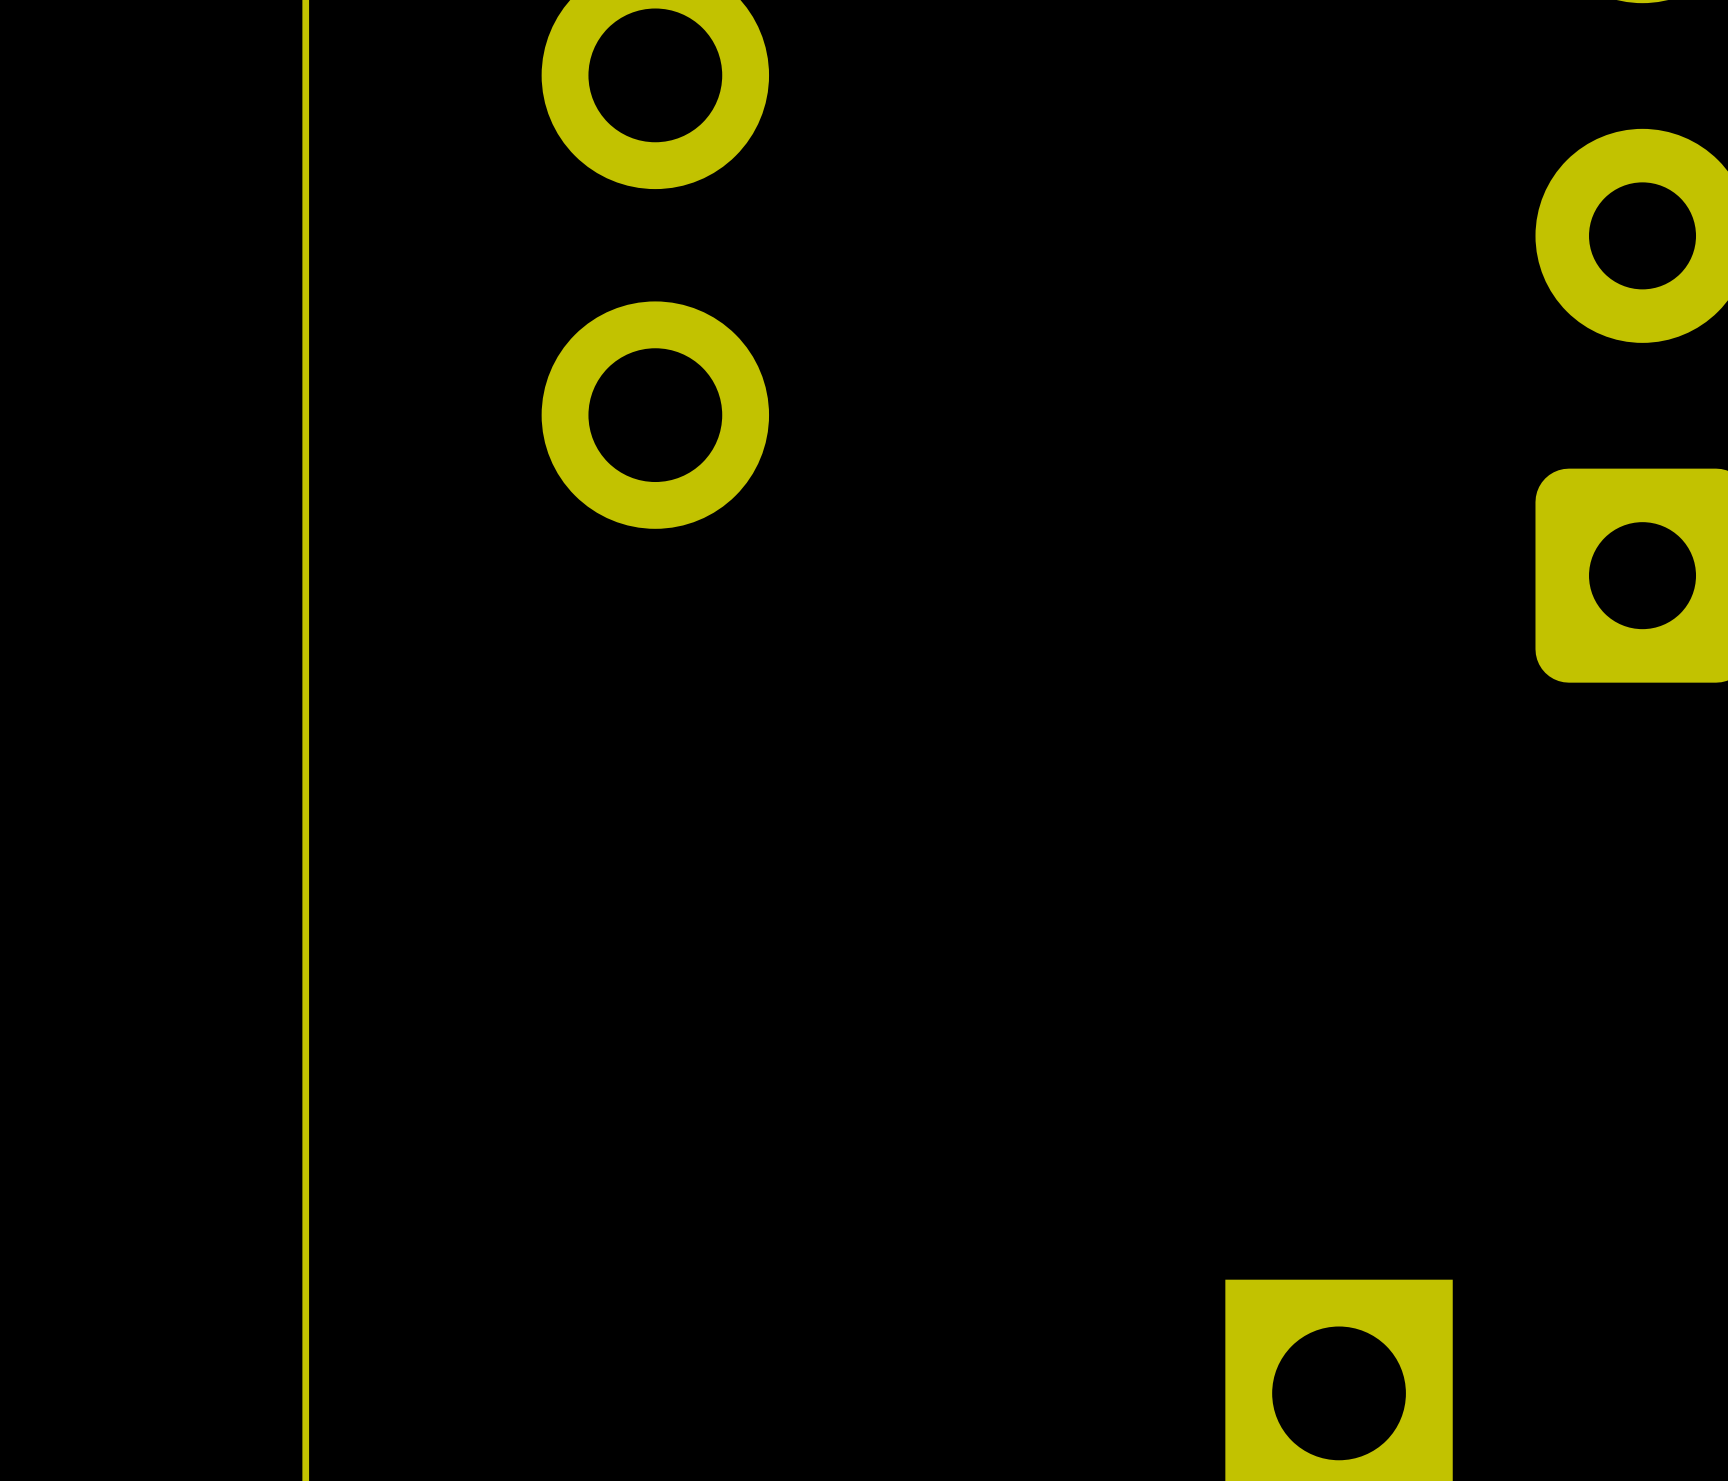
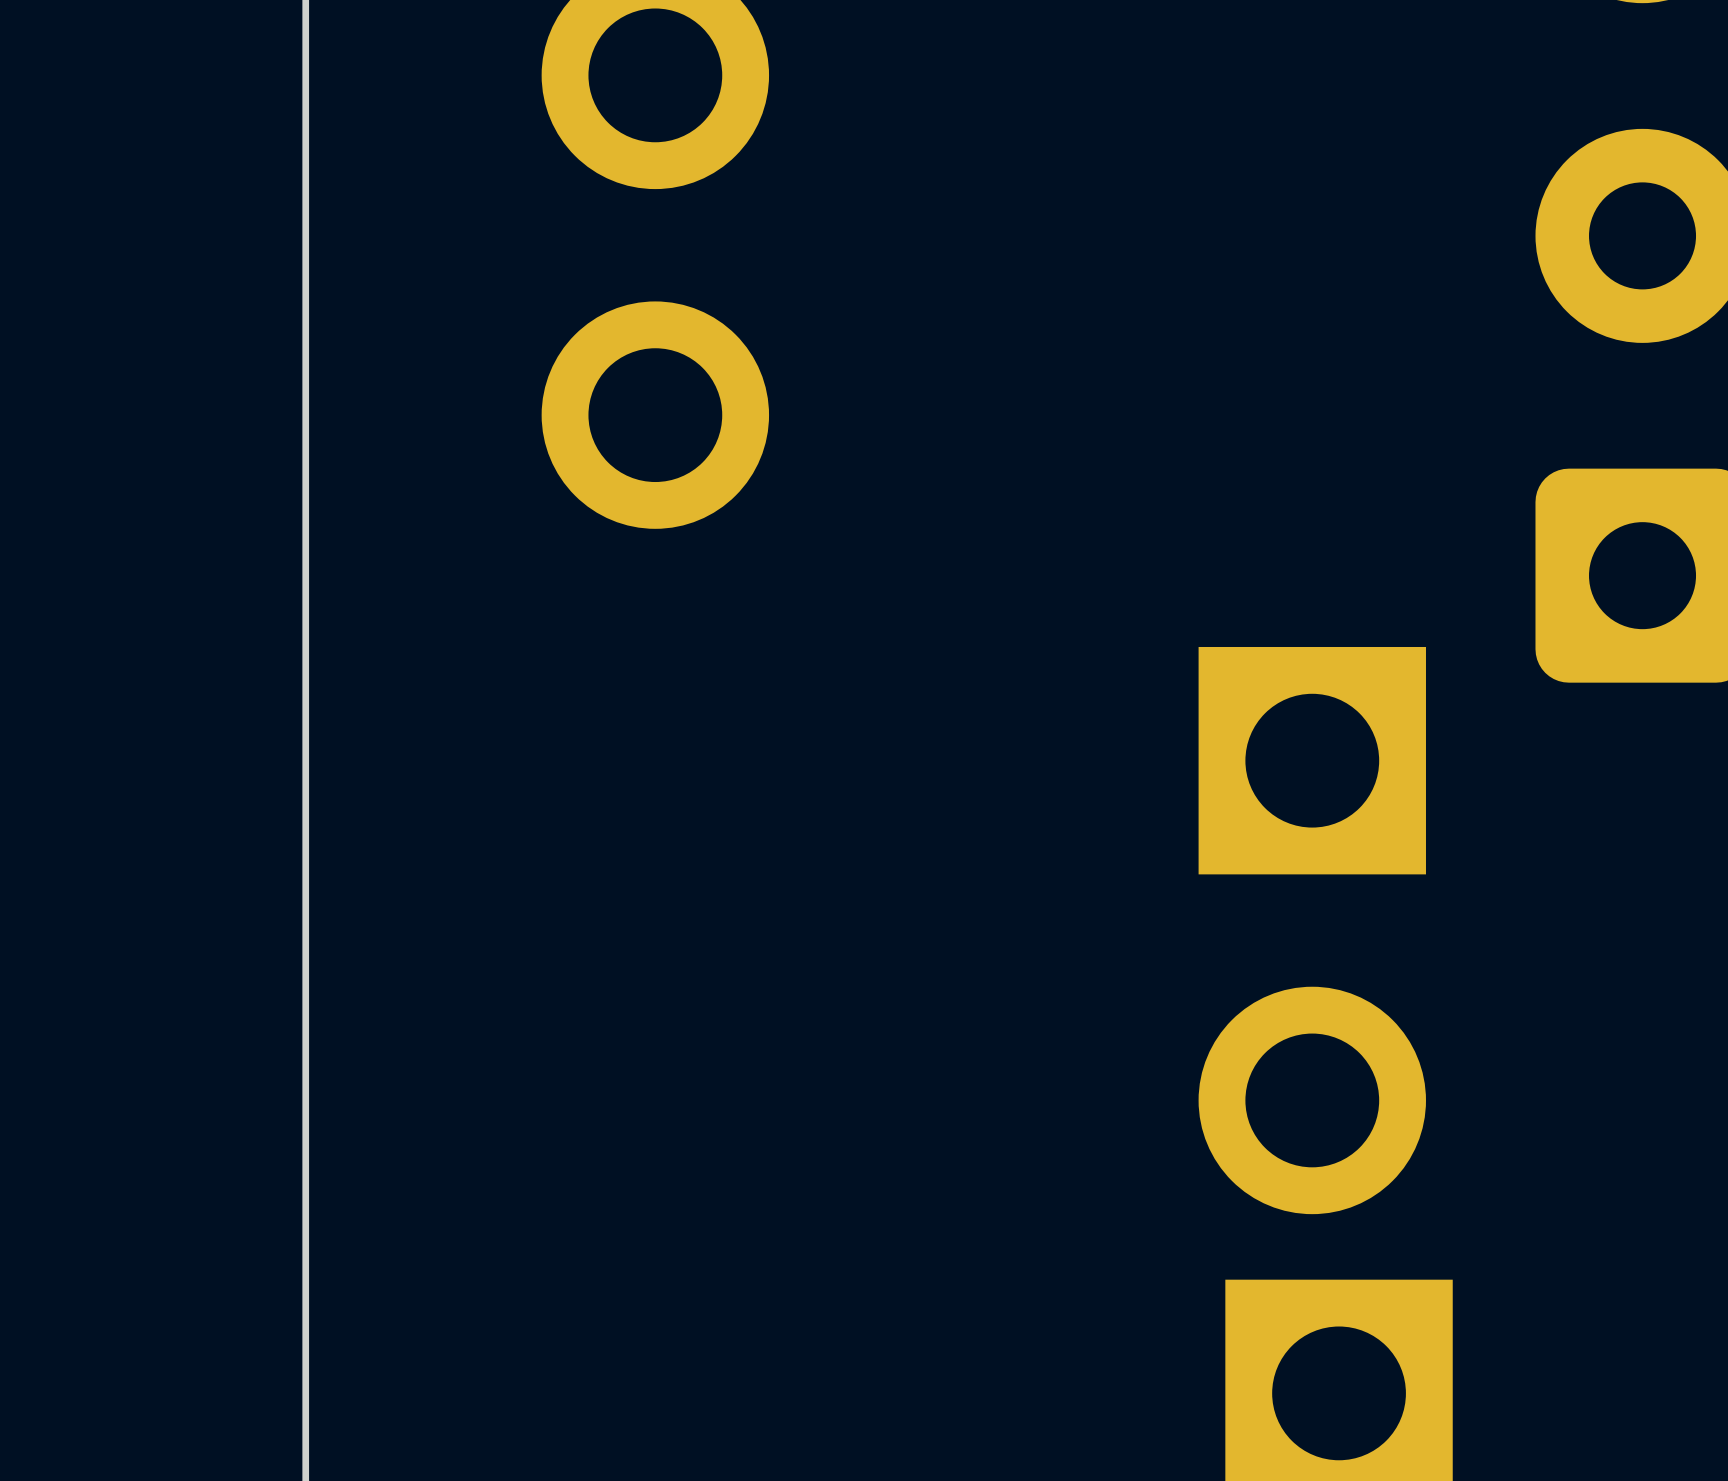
part: none -> (1312, 930)

